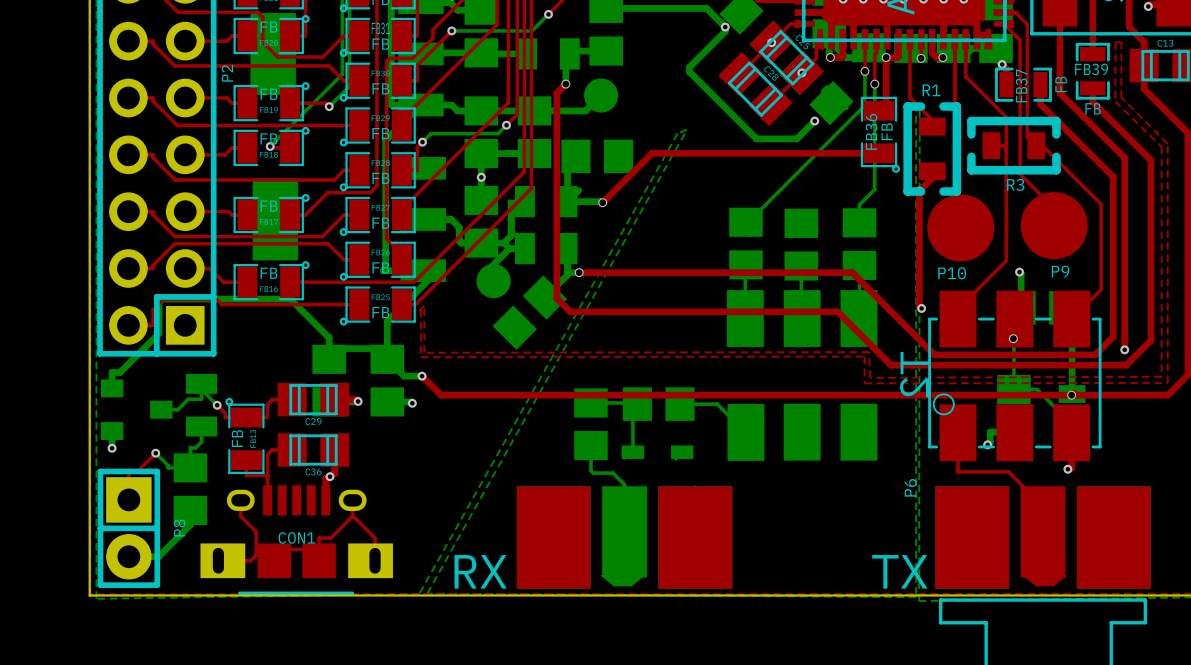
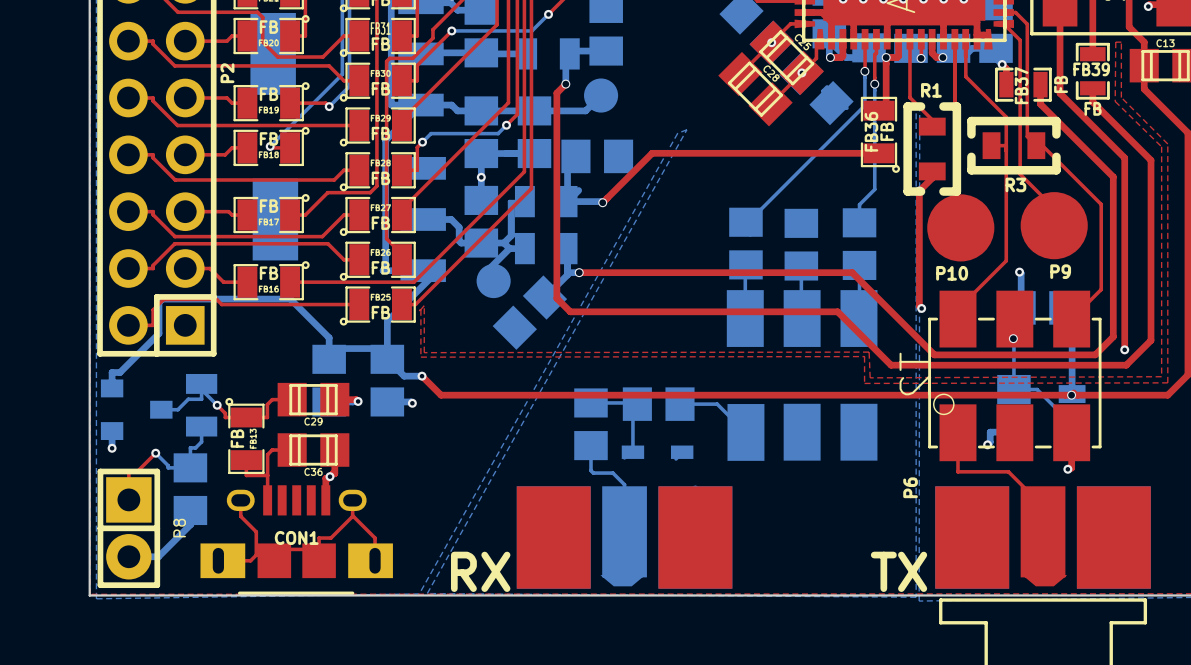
bottom track: (606, 8) (706, 8) (725, 27) (725, 31) (689, 67) (689, 71) (756, 138) (796, 138) (814, 121) -> none
via: (725, 27) -> none
via: (814, 121) -> none

